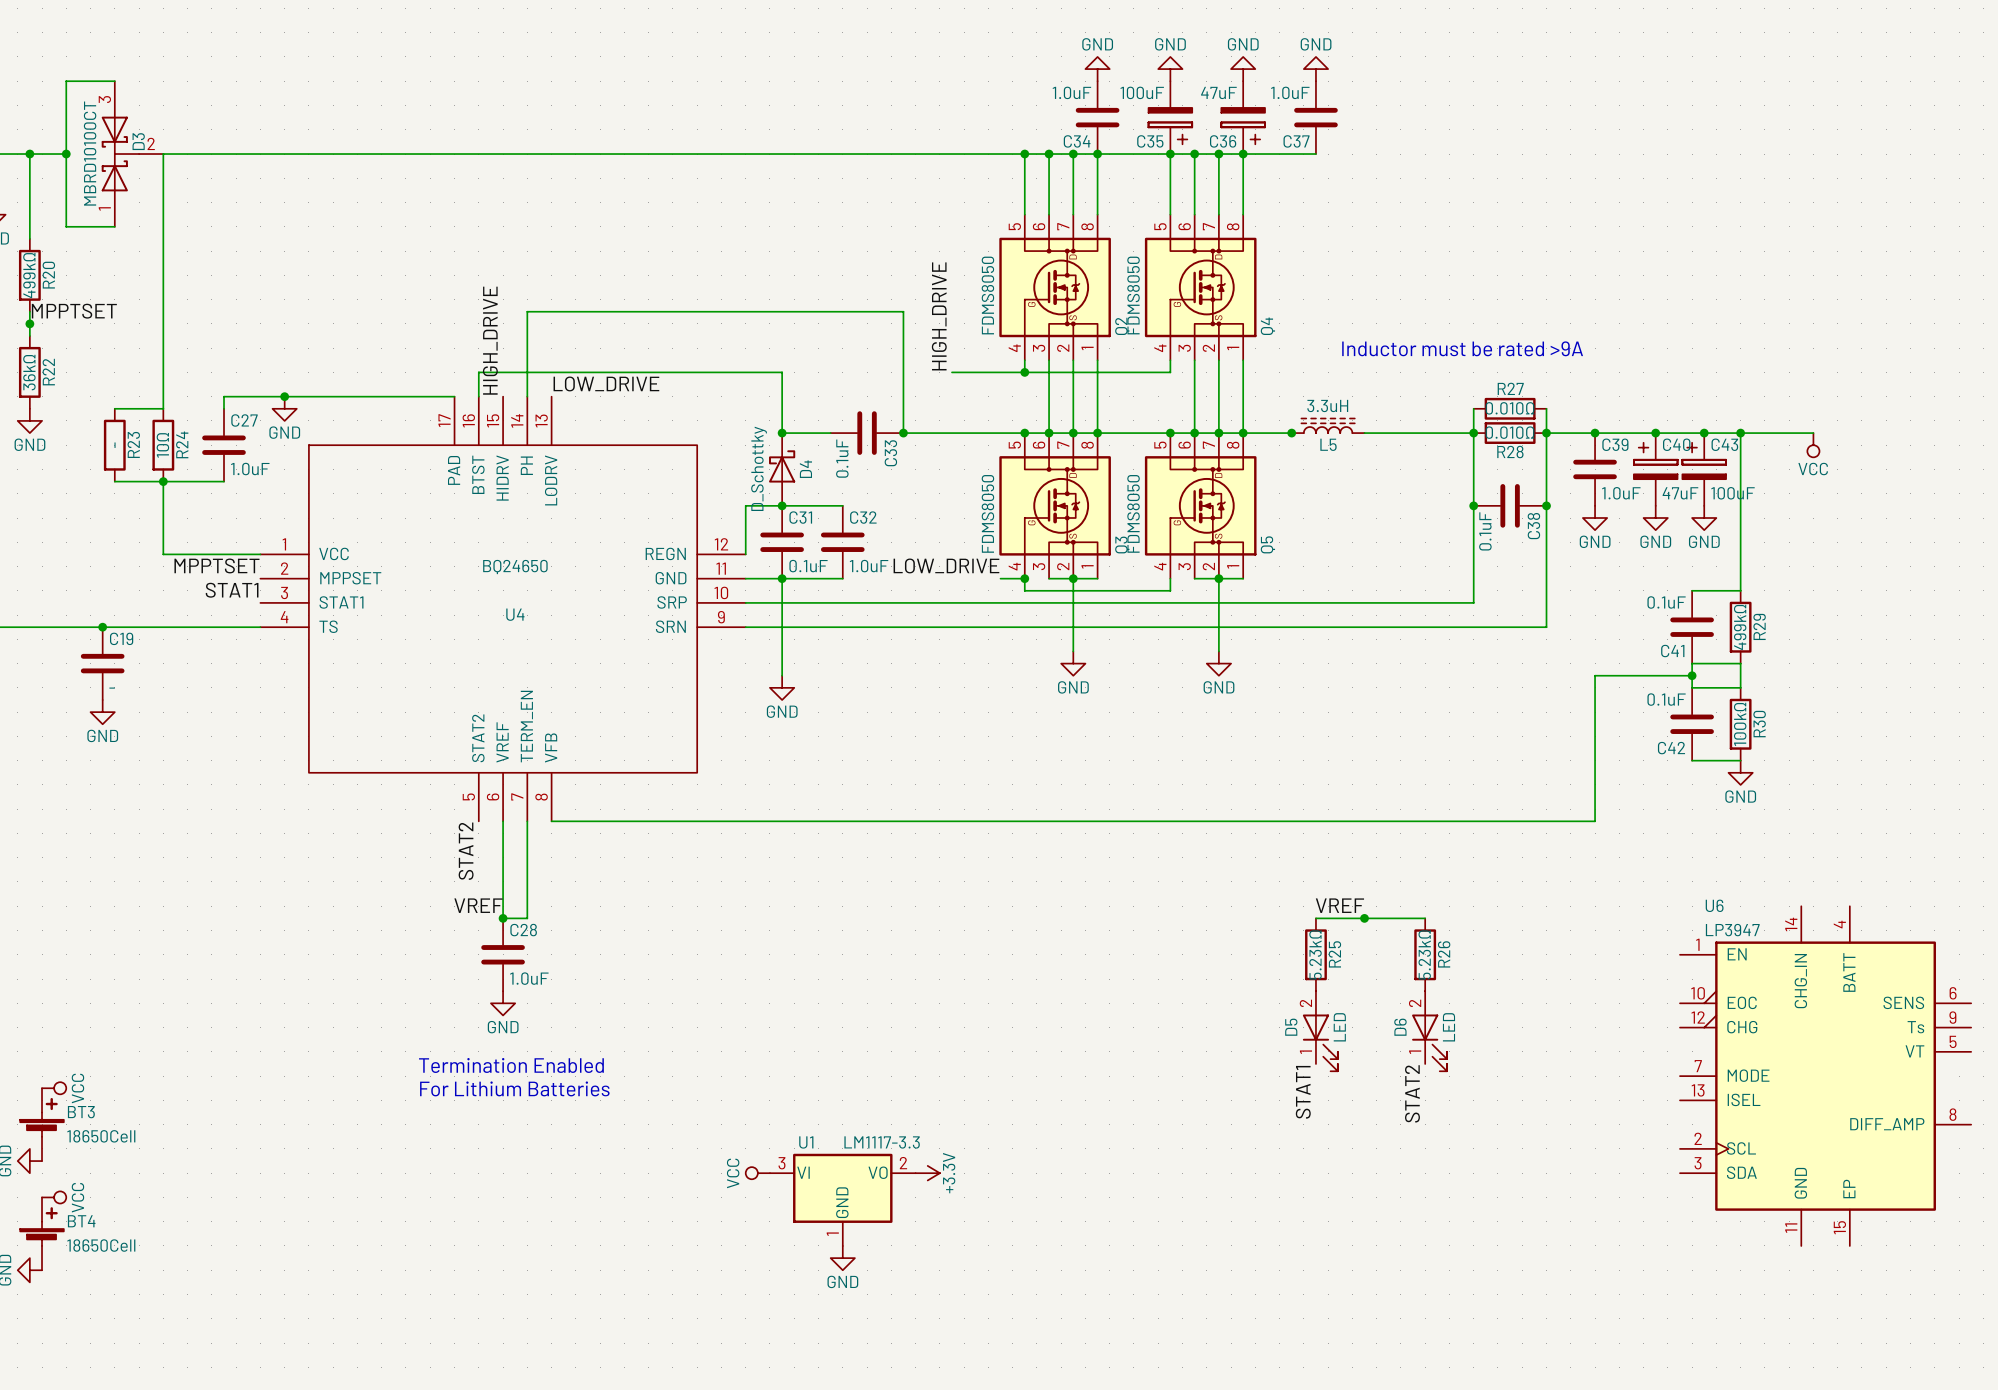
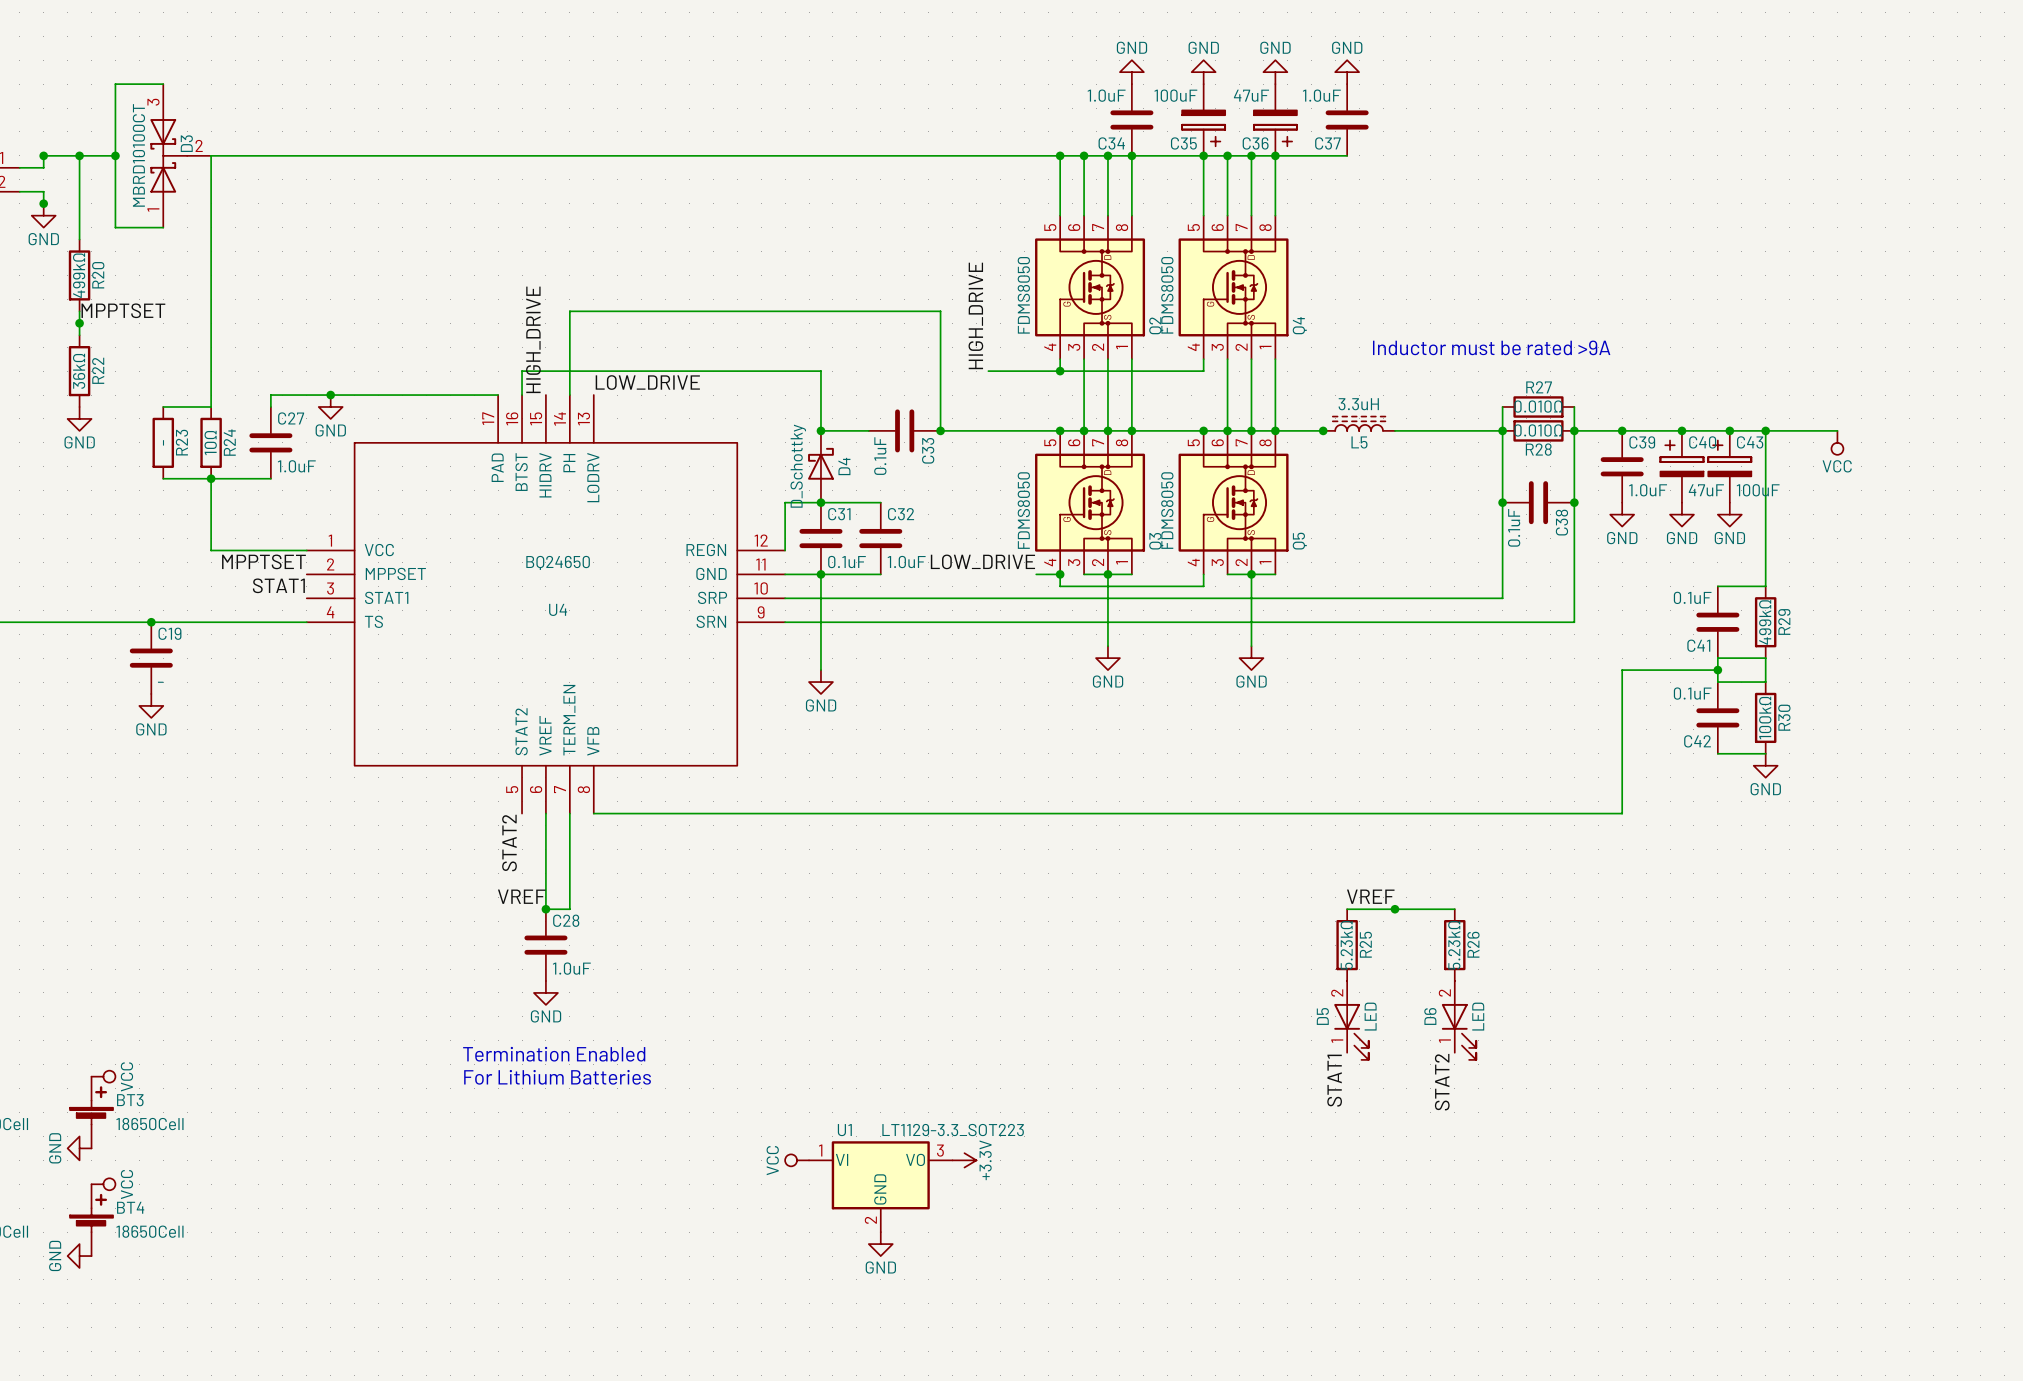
U6: LP3947 (1825, 1076) -> none
U1 value: LM1117-3.3 (882, 1142) -> LT1129-3.3_SOT223 (953, 1130)
U1 pin number: 3 (781, 1163) -> 1 (820, 1150)
U1 pin number: 2 (903, 1163) -> 3 (940, 1150)
U1 pin number: 1 (832, 1234) -> 2 (870, 1220)

